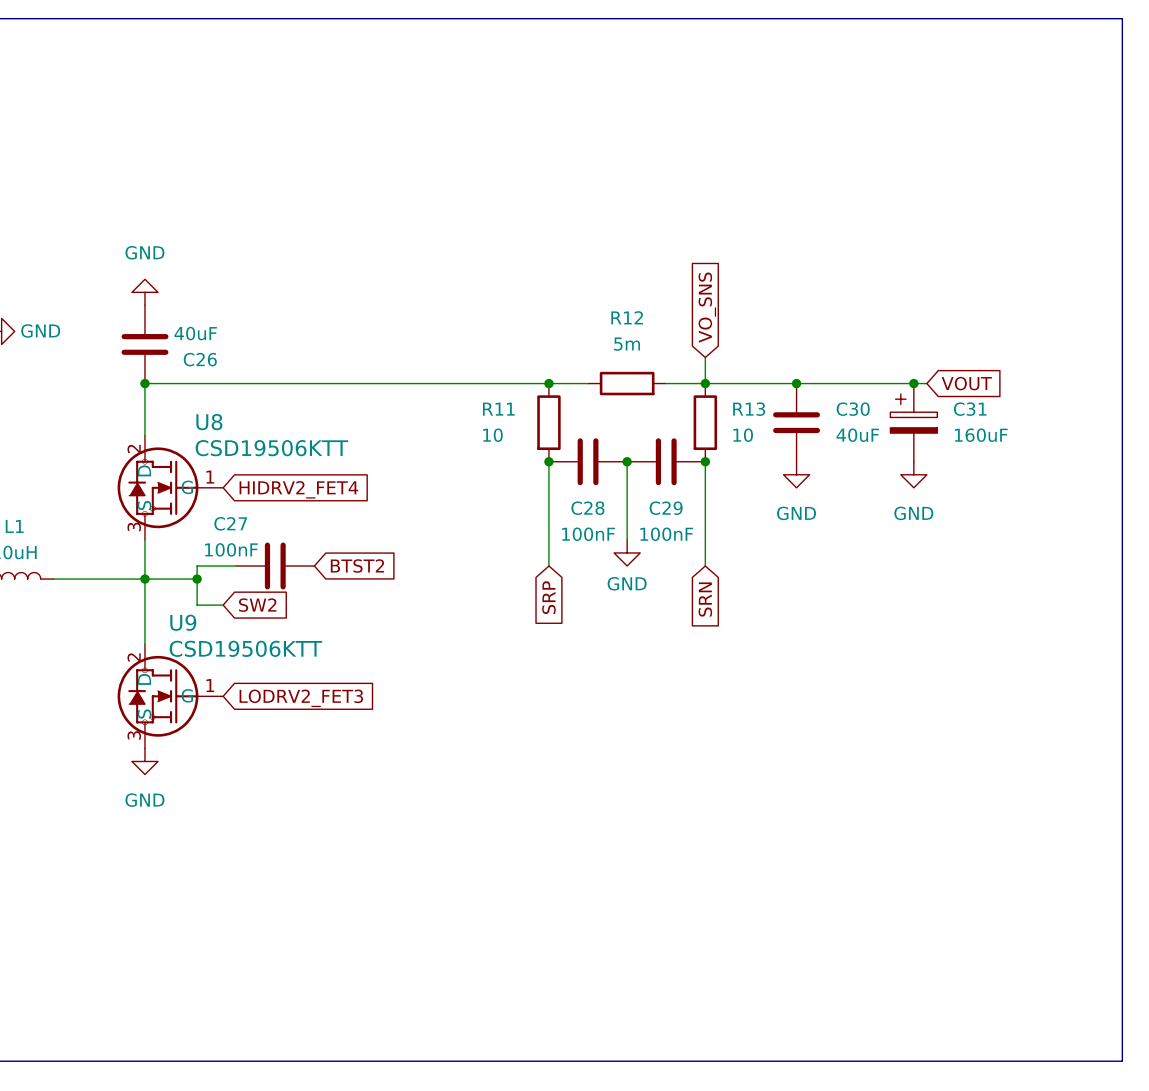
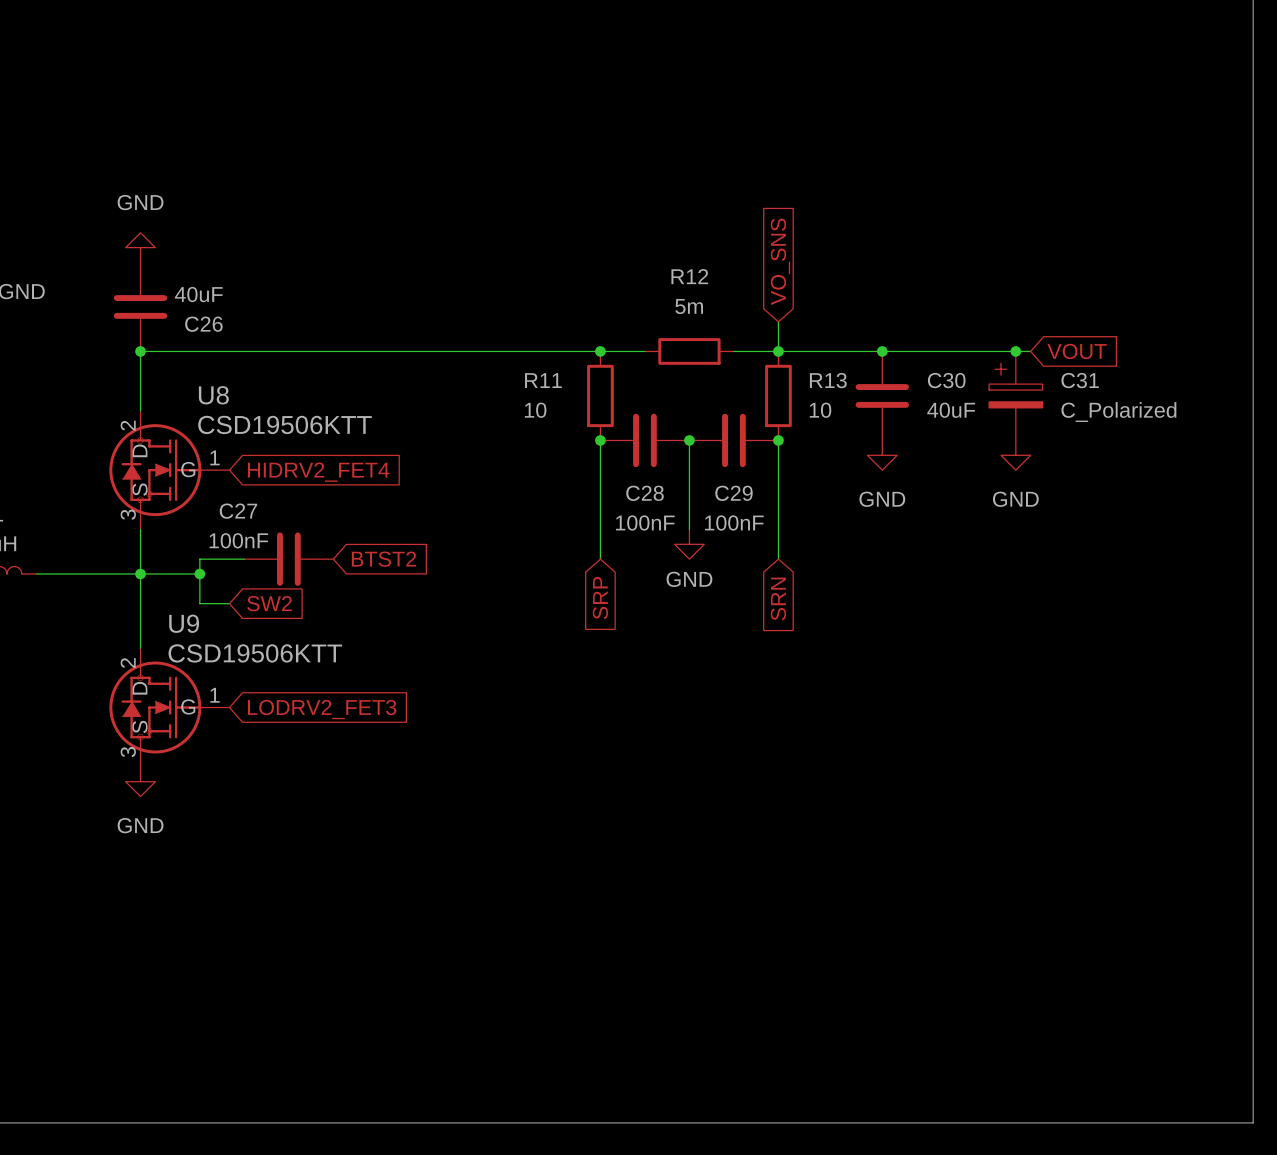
C31 value: 160uF (981, 435) -> C_Polarized (1118, 411)

